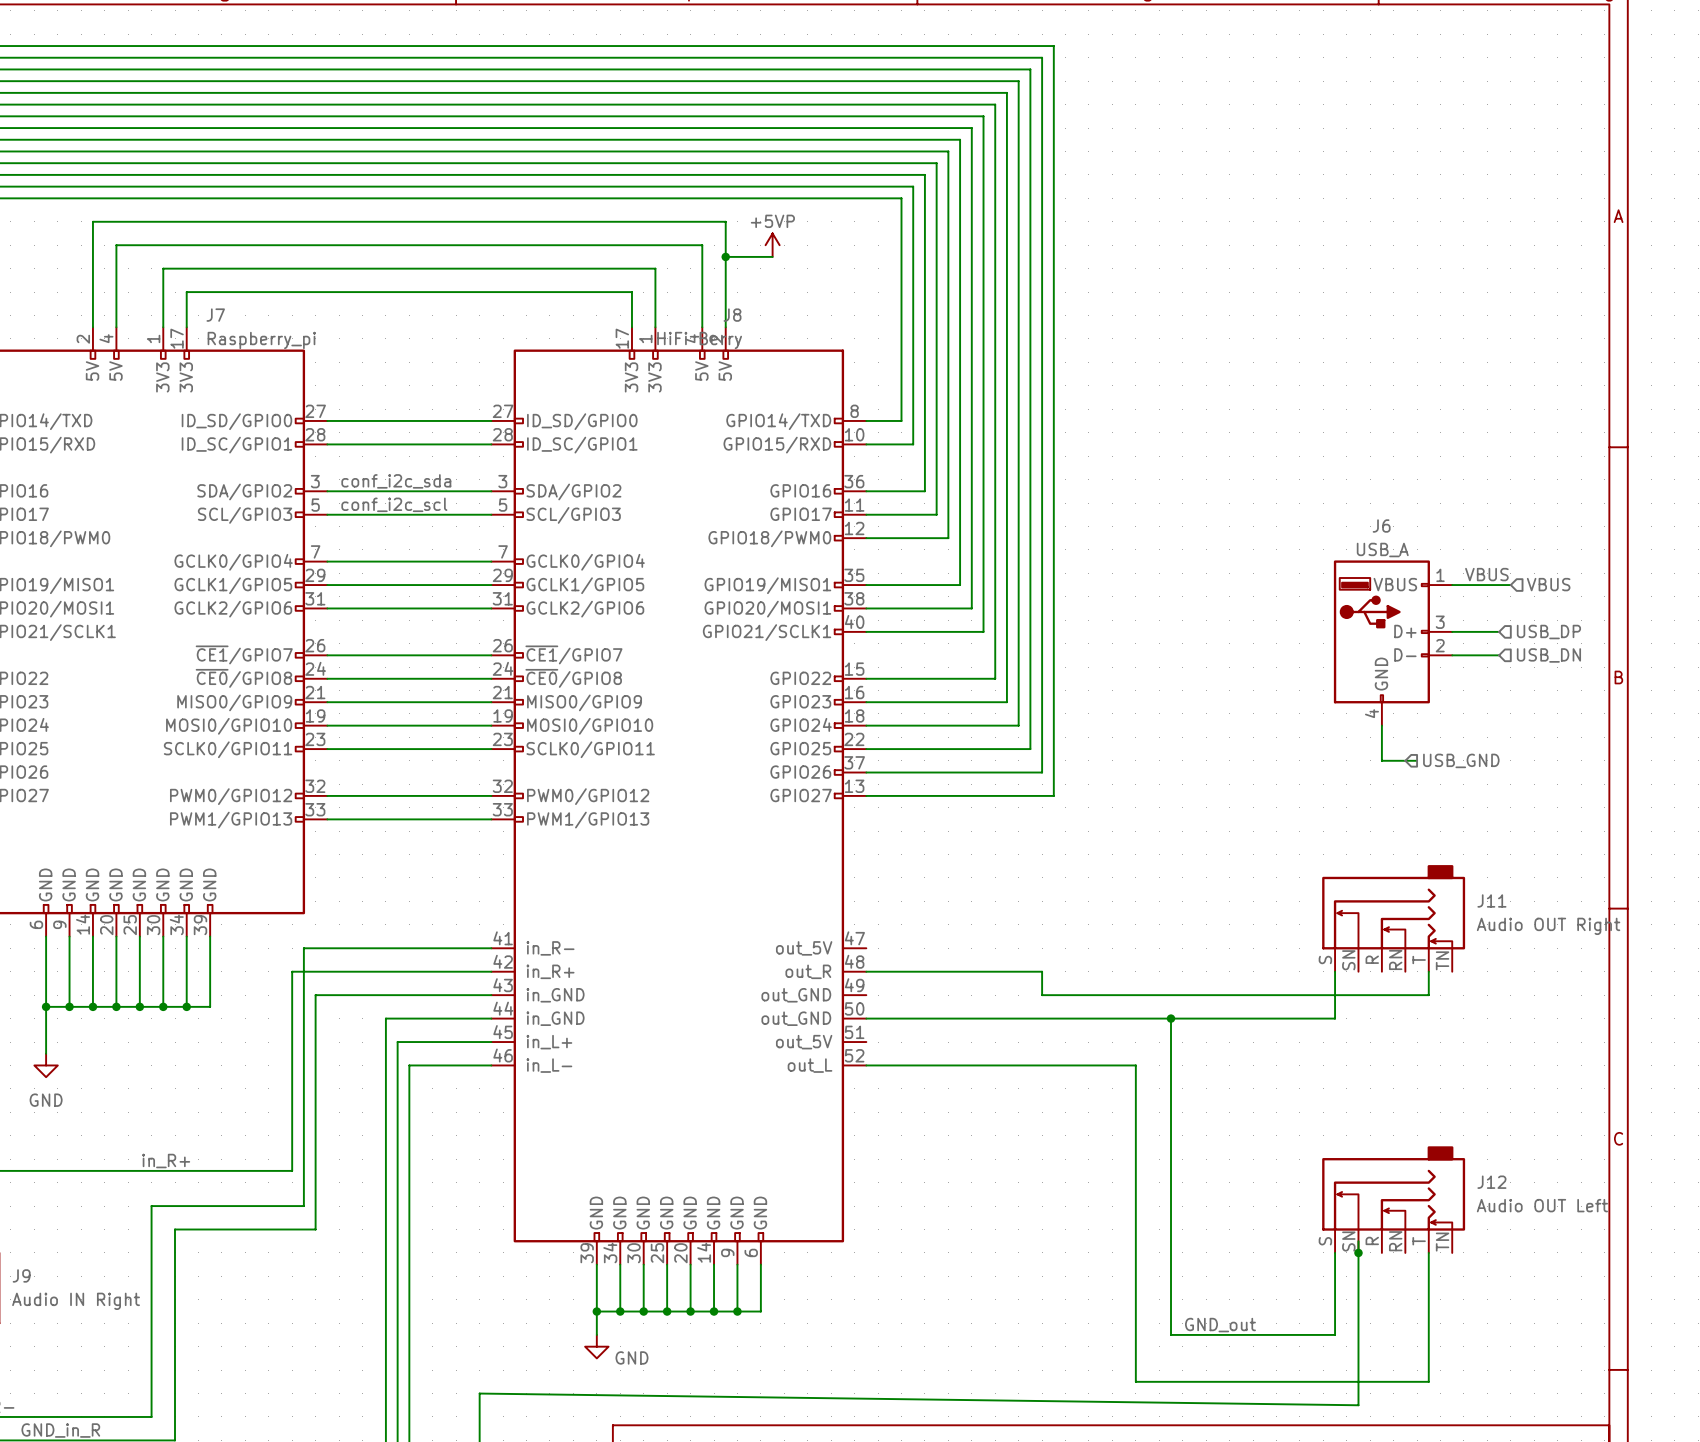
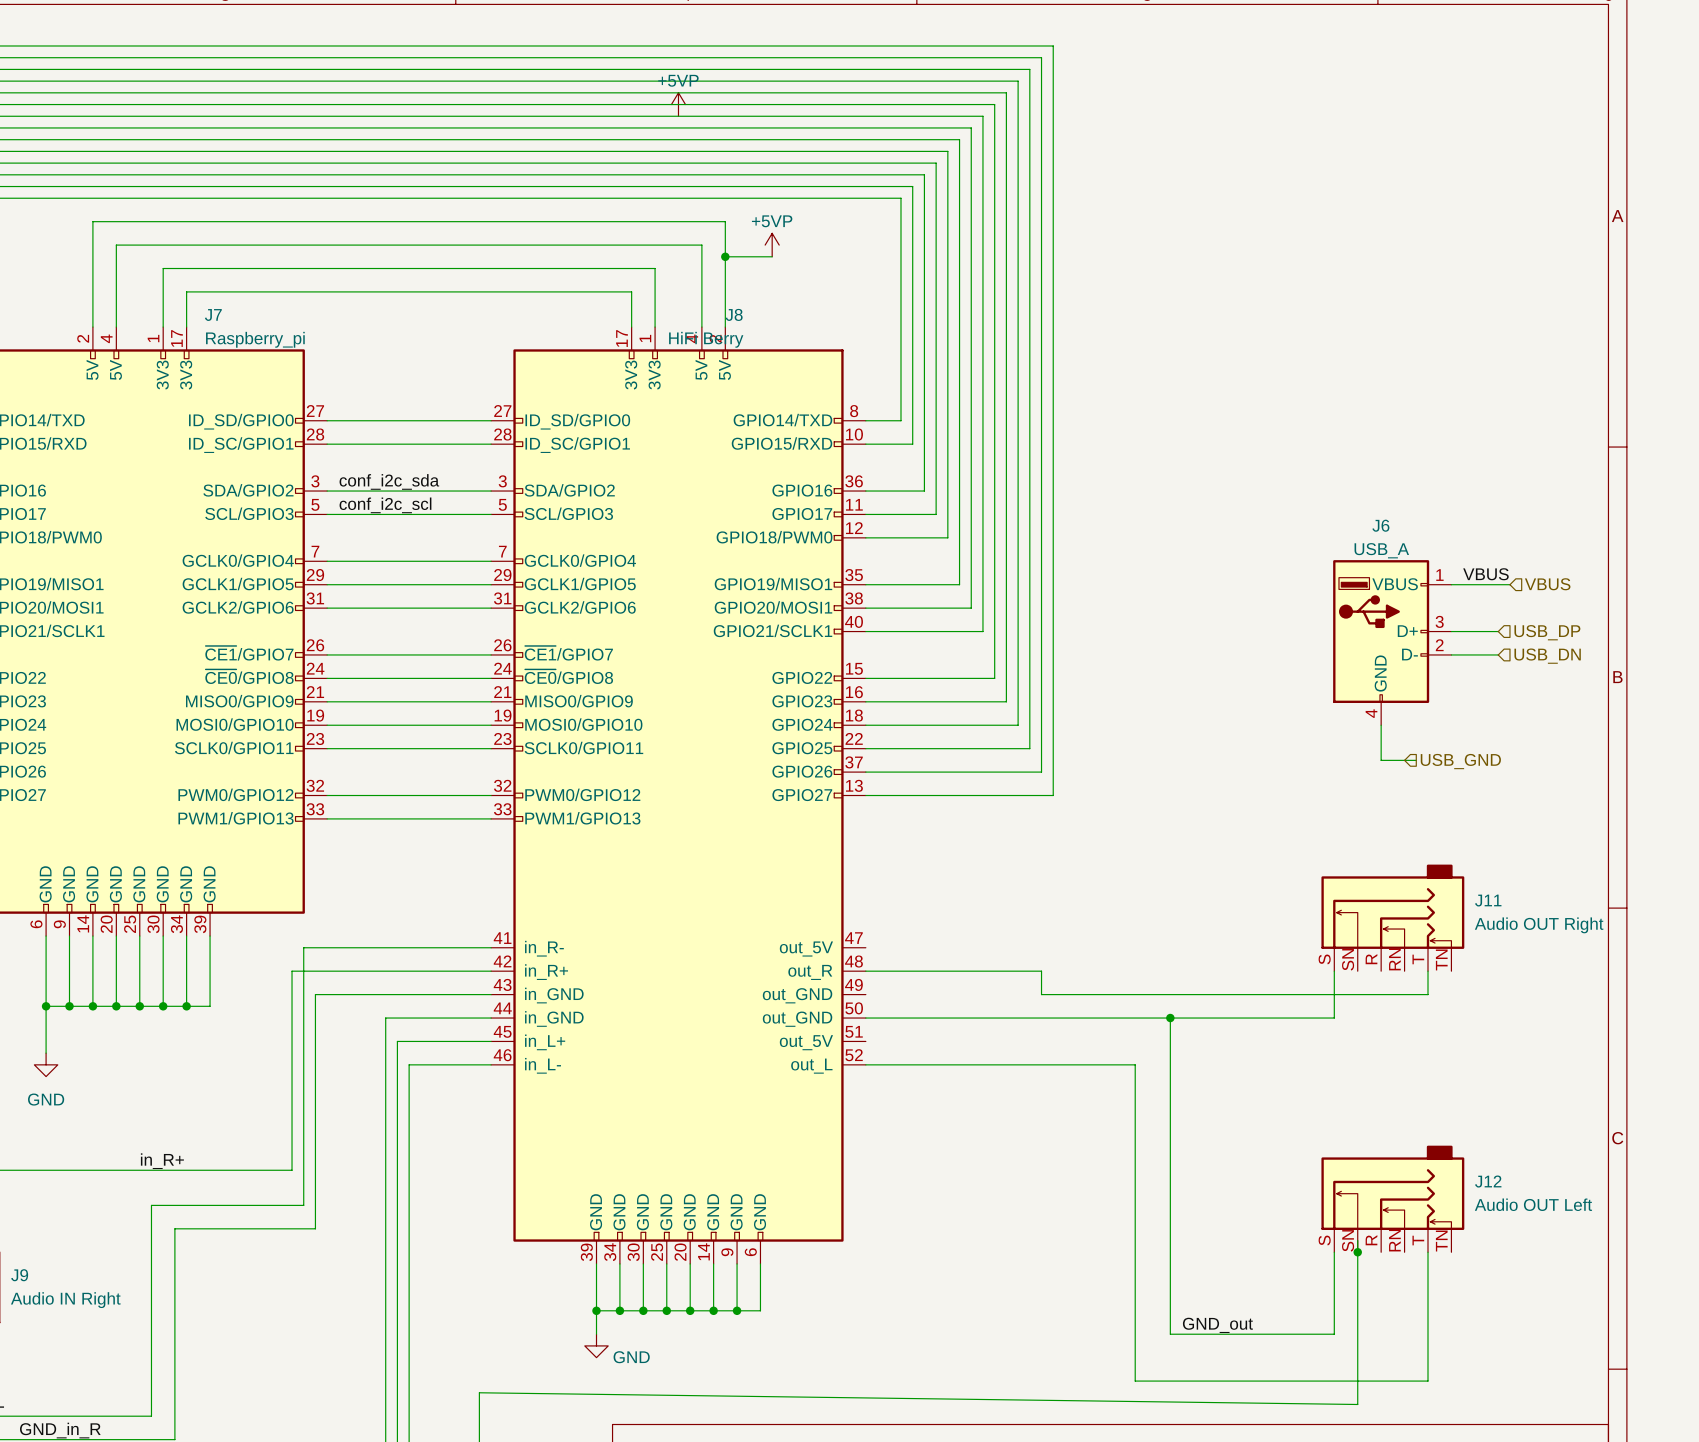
power symbol: none -> +5VP (678, 104)

